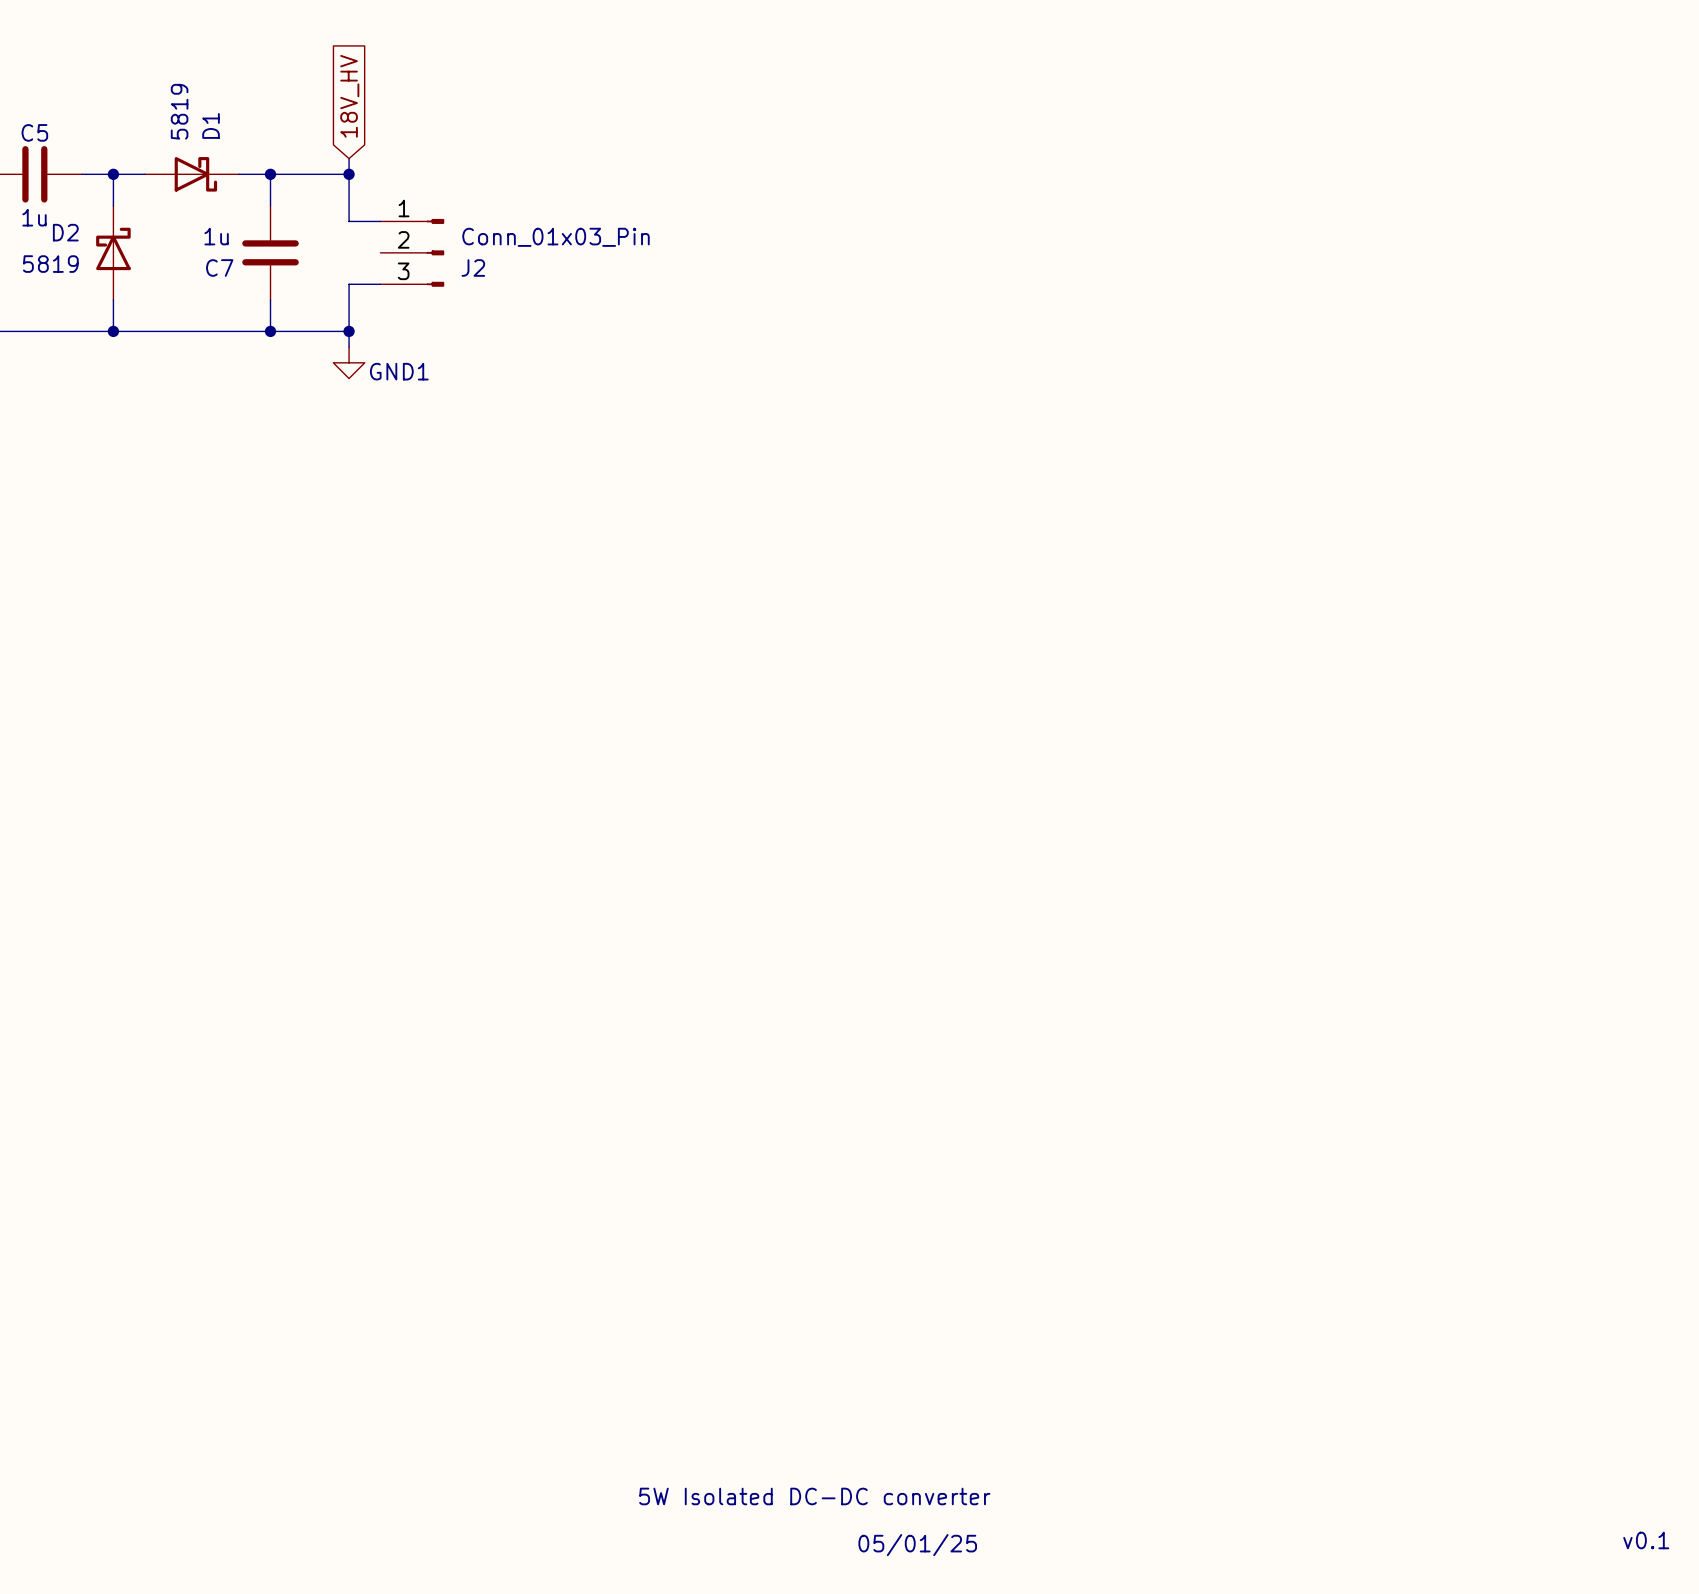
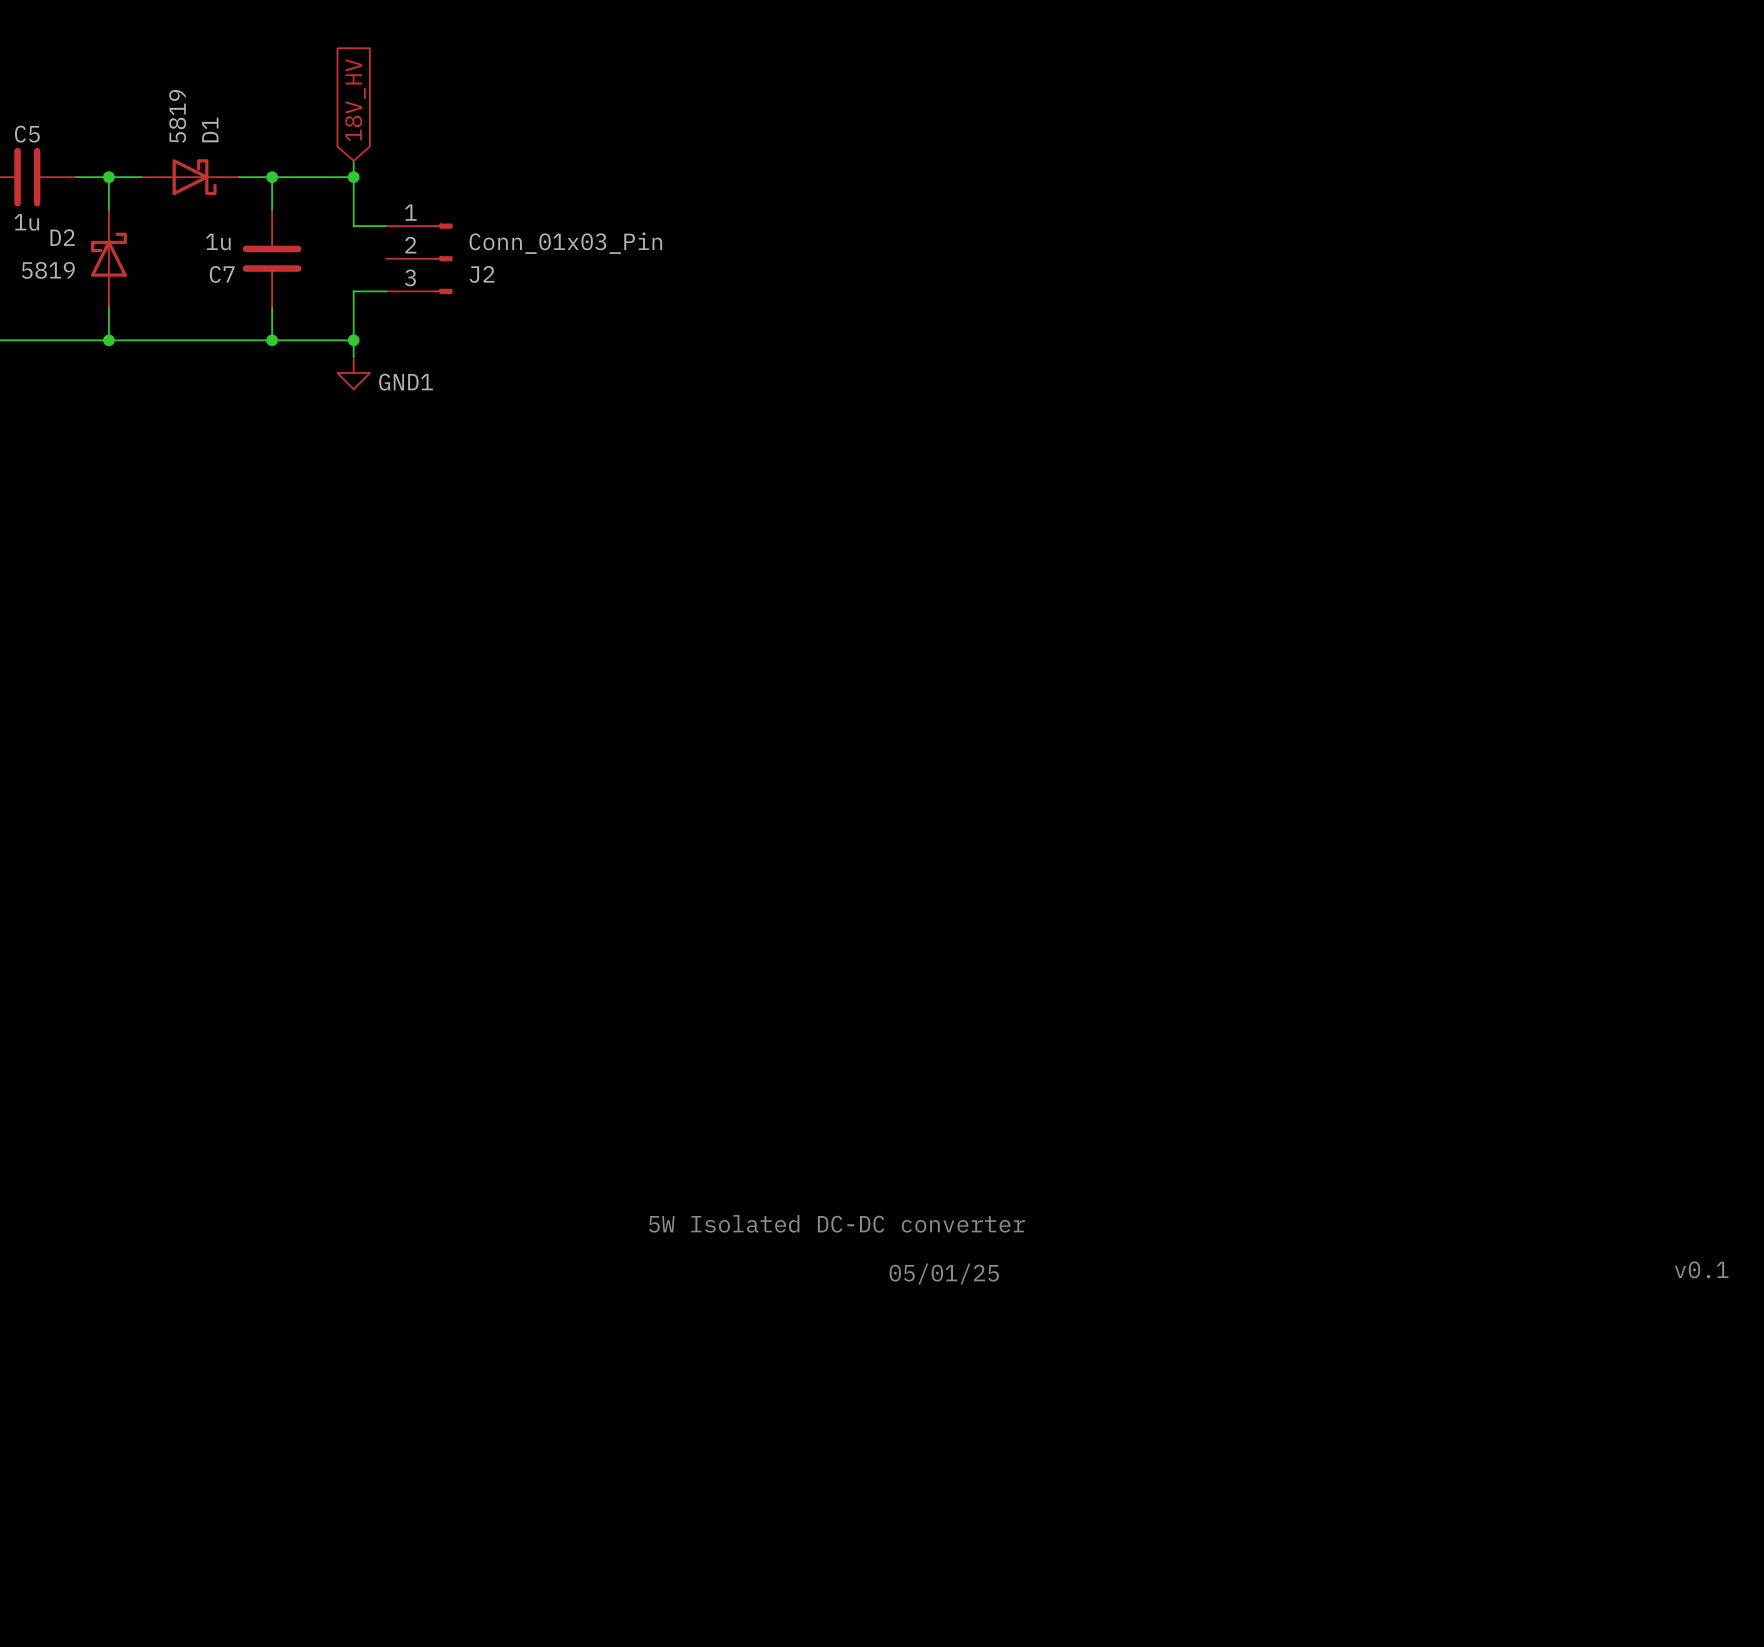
text: none -> 5W Isolated DC-DC converter (837, 1223)
text: none -> v0.1 (1701, 1269)
text: none -> 05/01/25 (944, 1274)
text: 5W Isolated DC-DC converter (814, 1496) -> none
text: v0.1 (1646, 1540) -> none
text: 05/01/25 (917, 1545) -> none

